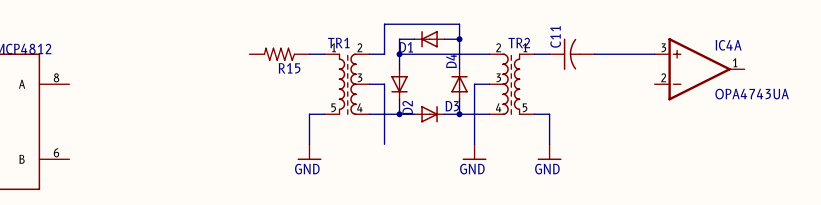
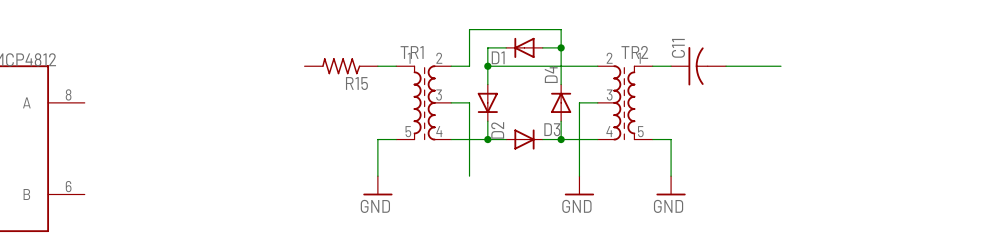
wire: (639, 54) (654, 54) -> none
IC4A: OPA4743UA (699, 69) -> none

